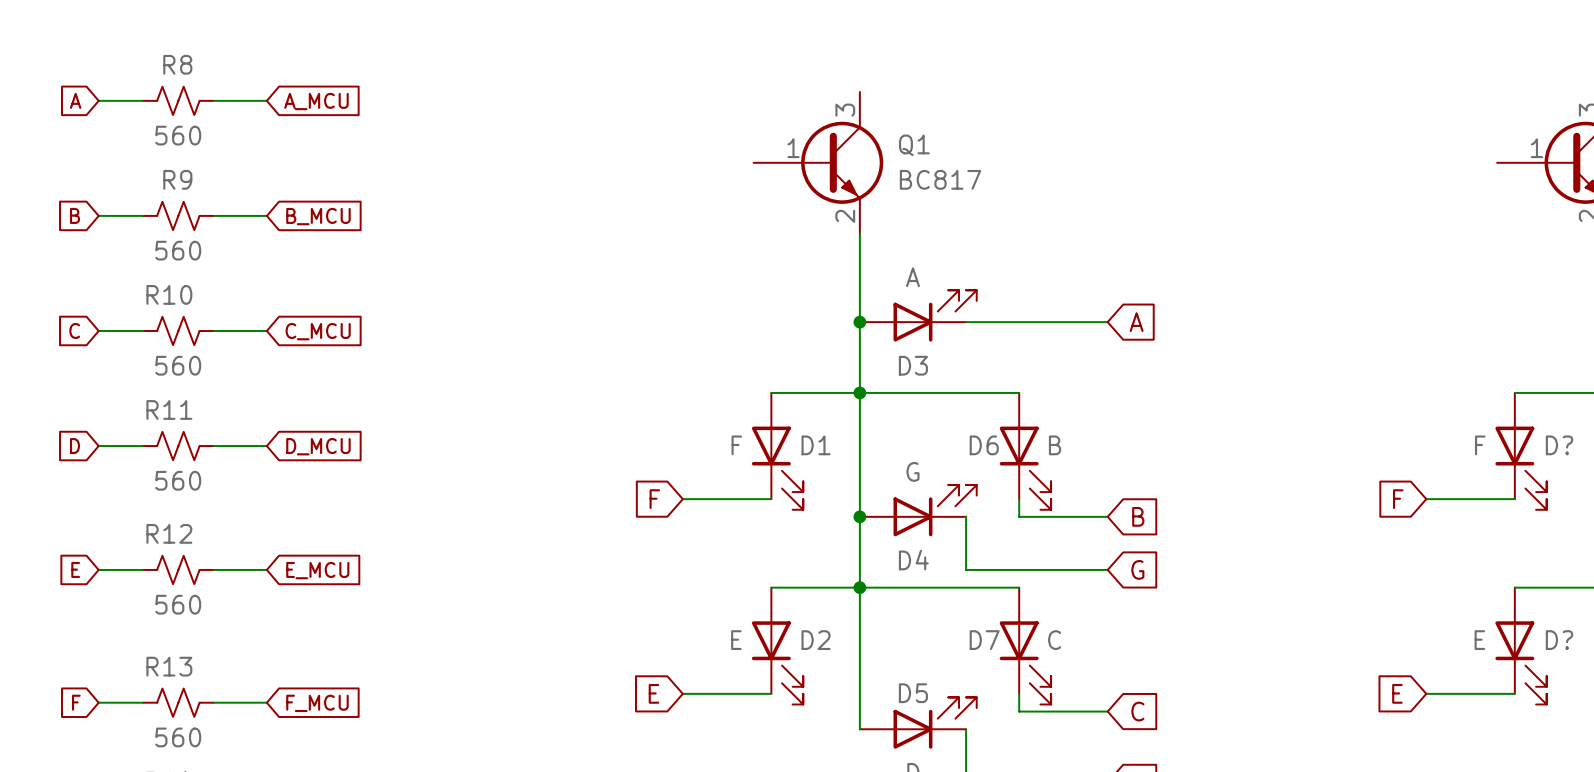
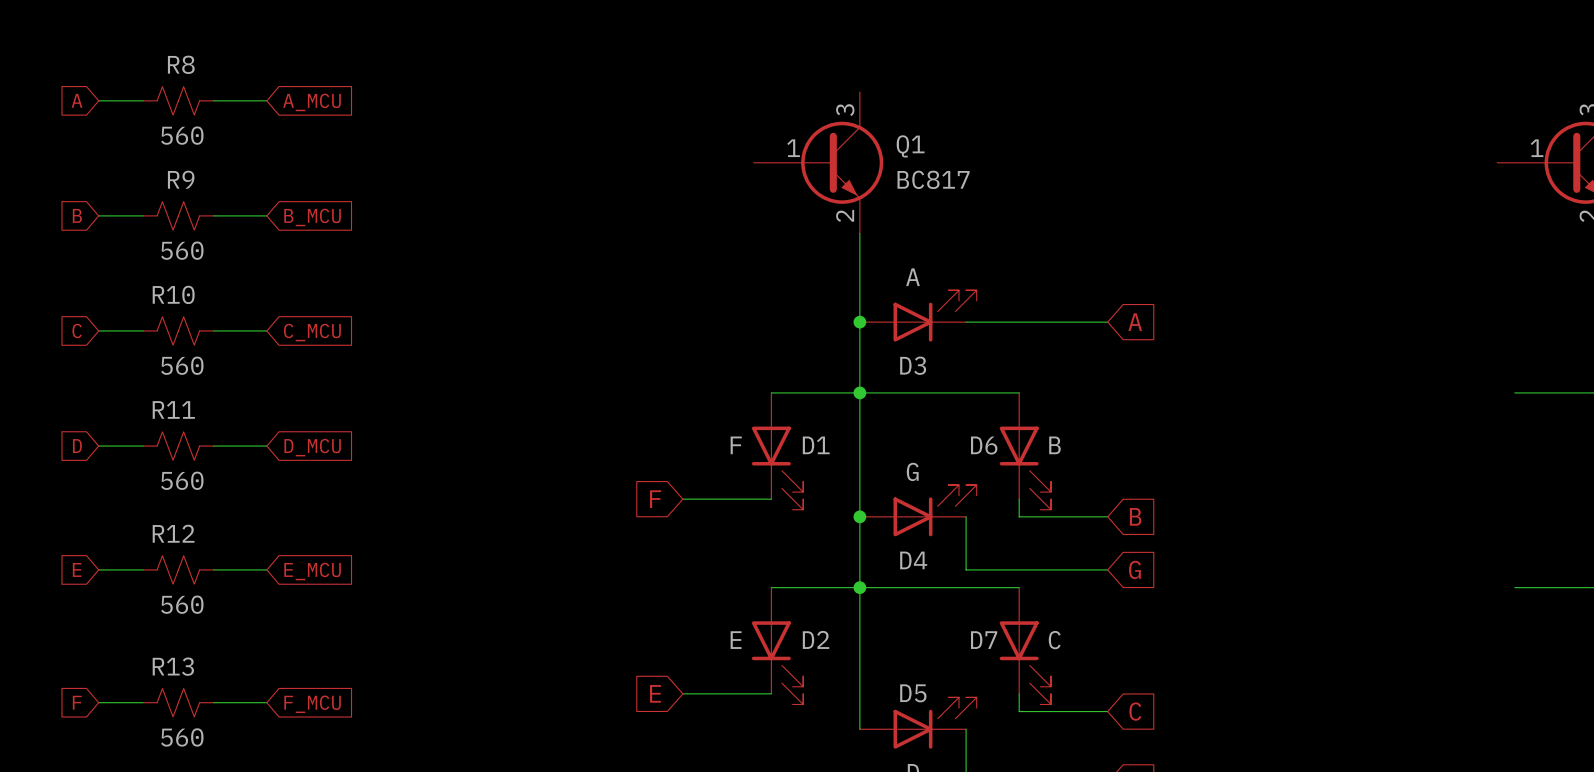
D?: F (1521, 451) -> none
global label: F (1398, 499) -> none
wire: (1426, 499) (1514, 499) -> none
D?: E (1521, 646) -> none
global label: E (1397, 693) -> none
wire: (1426, 693) (1514, 693) -> none

